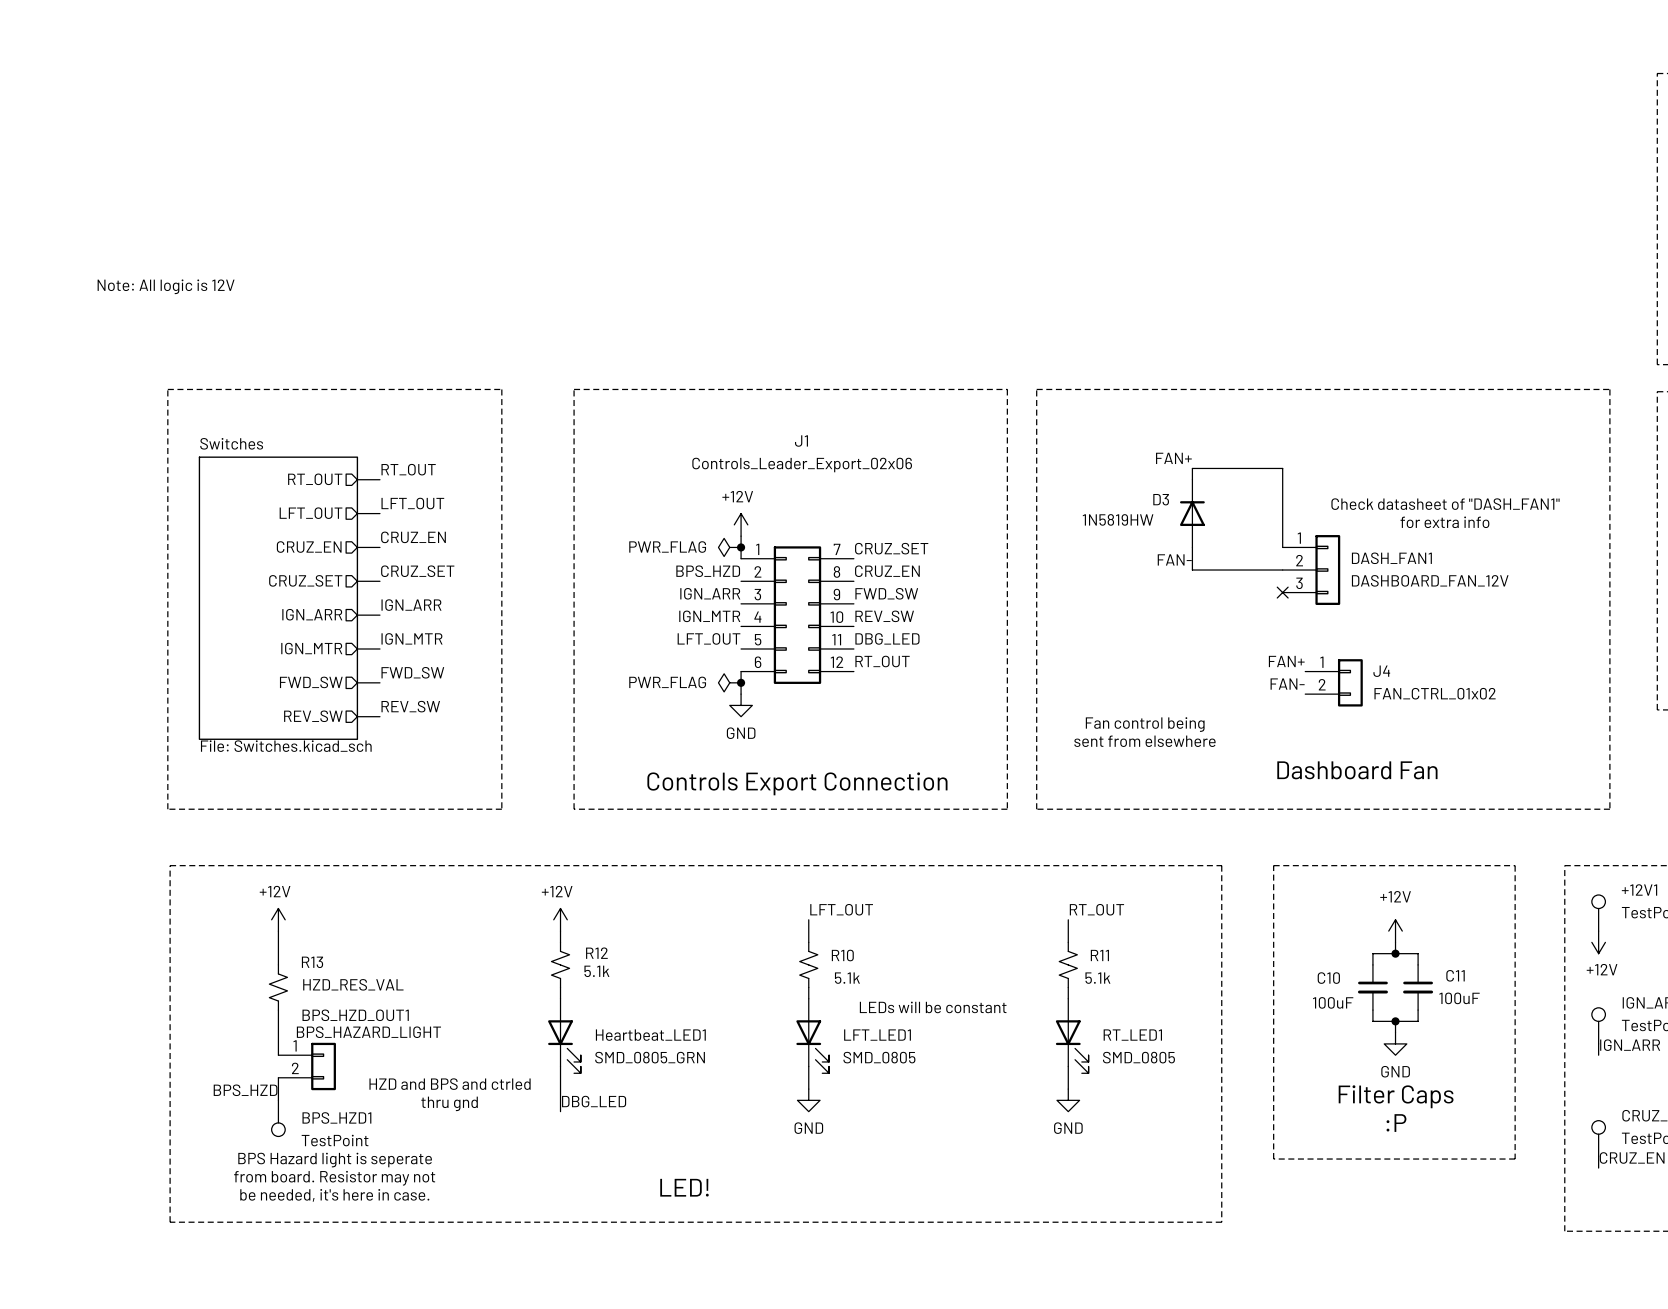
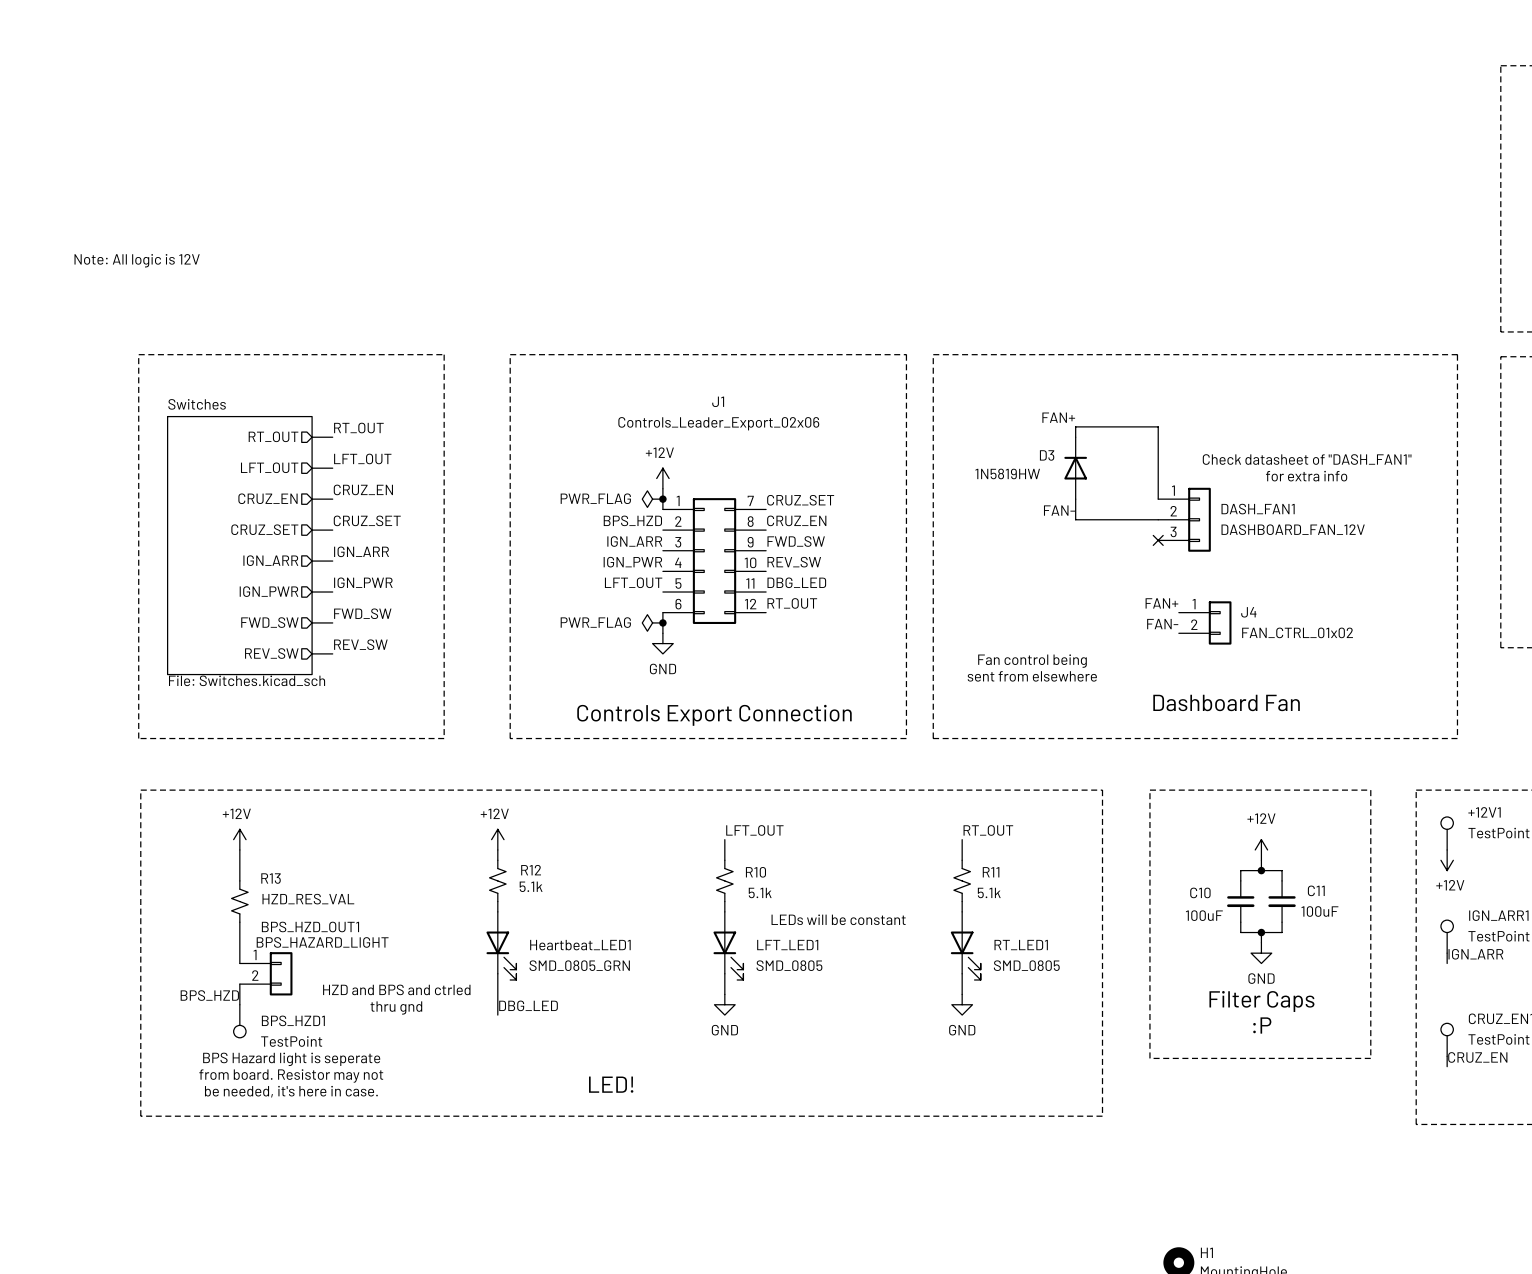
label: IGN_MTR (709, 616) -> IGN_PWR (632, 562)
label: IGN_MTR (411, 638) -> IGN_PWR (363, 582)
sheet pin: IGN_MTR (311, 648) -> IGN_PWR (268, 591)

